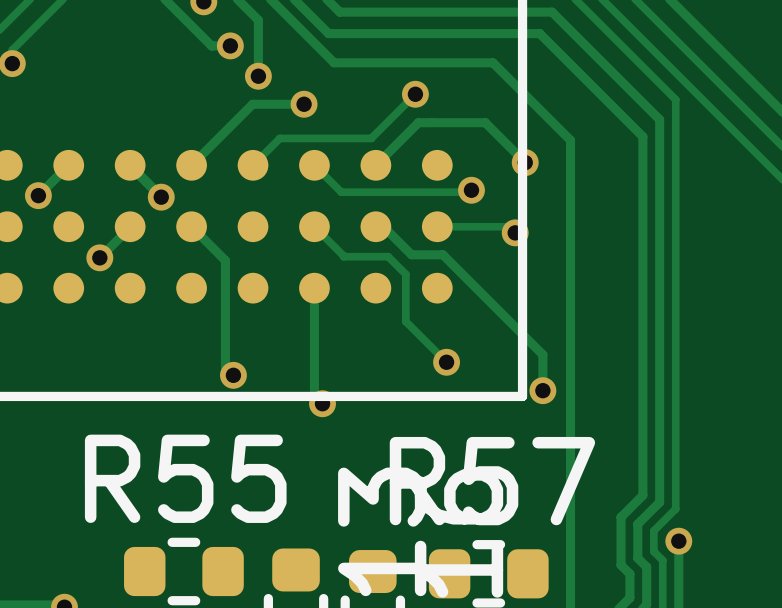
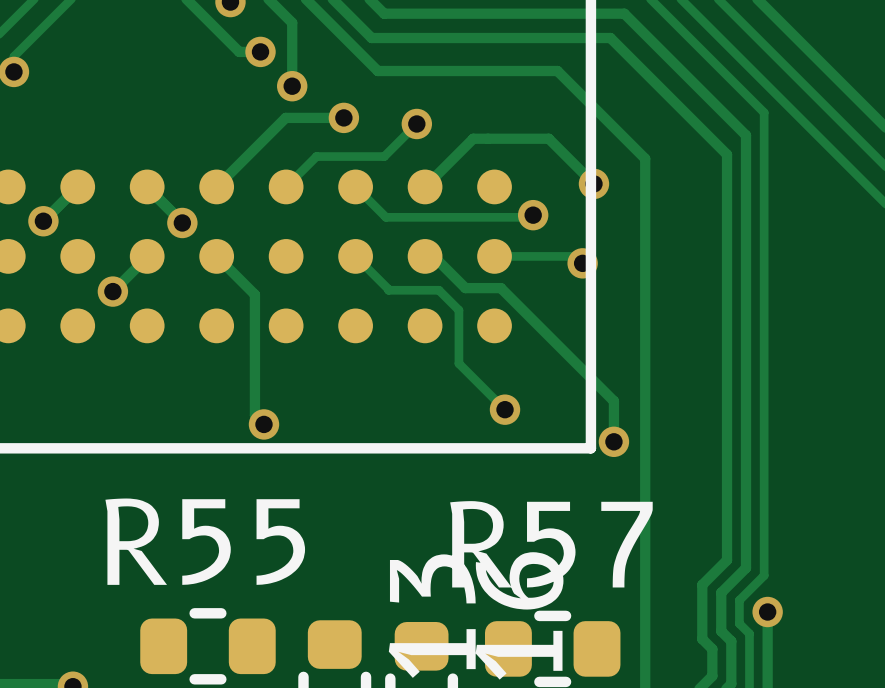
track: (415, 94) (371, 138) (339, 138) -> (416, 123) (384, 156)
via position: (415, 94) -> (416, 123)
track: (314, 288) (314, 395) (322, 403) -> none
via: (322, 403) -> none

